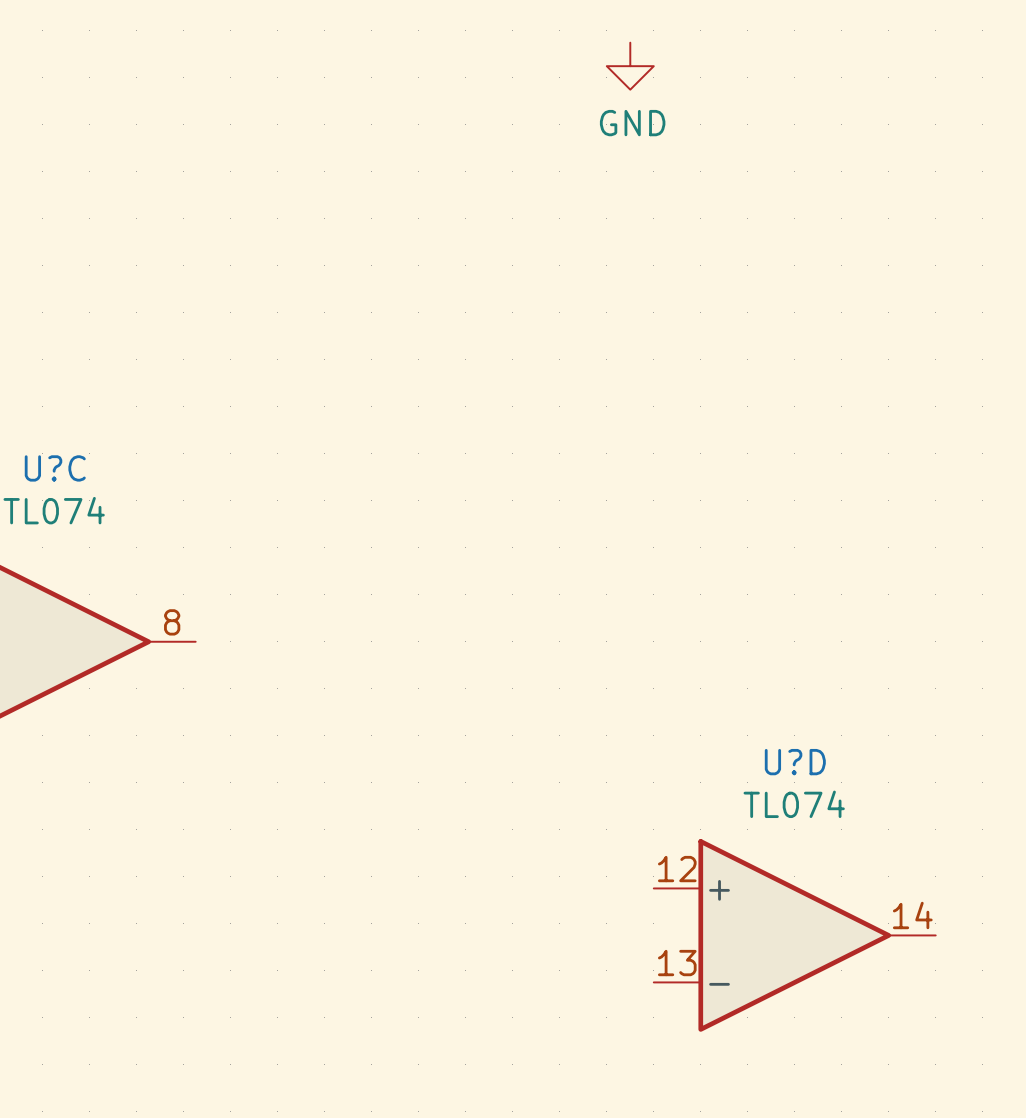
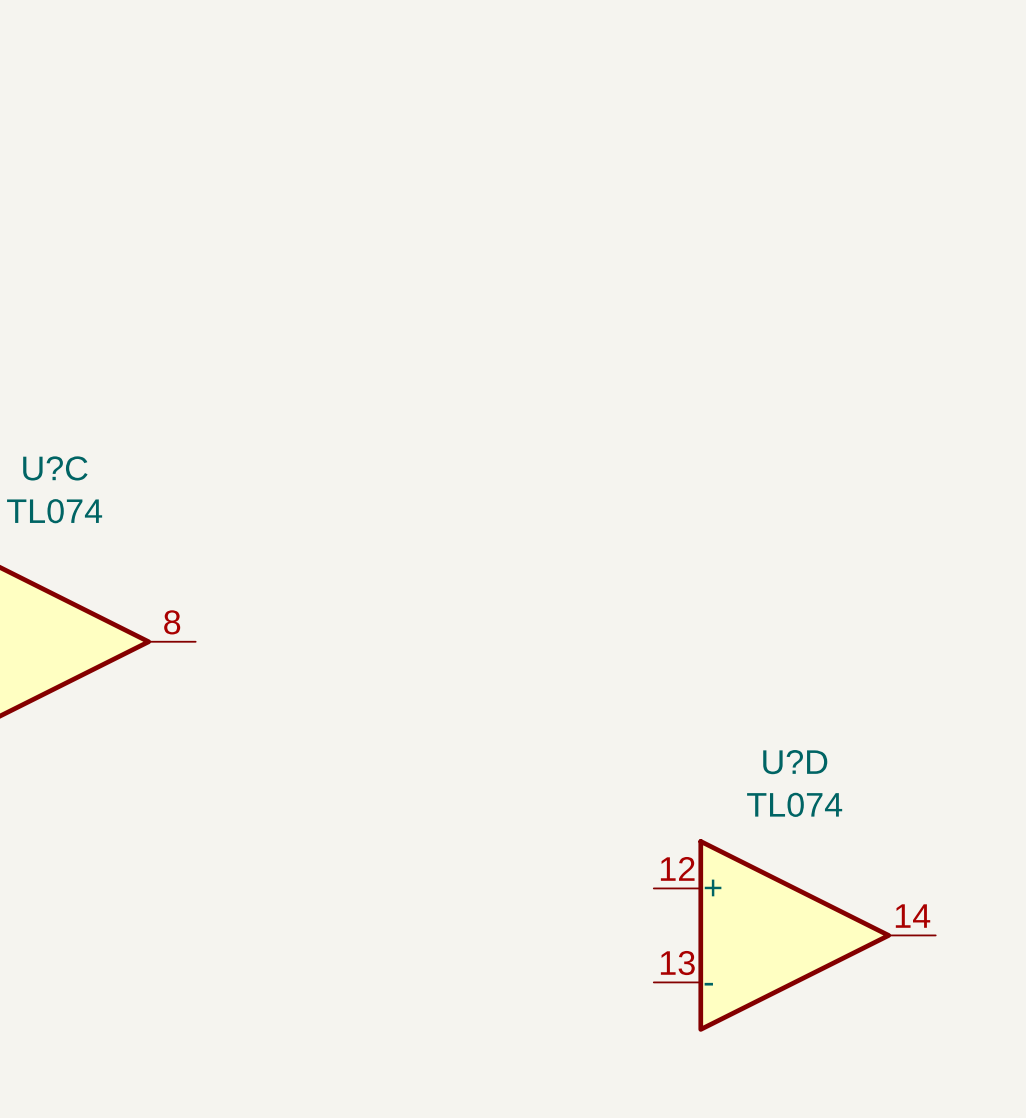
power symbol: GND (630, 66) -> none

